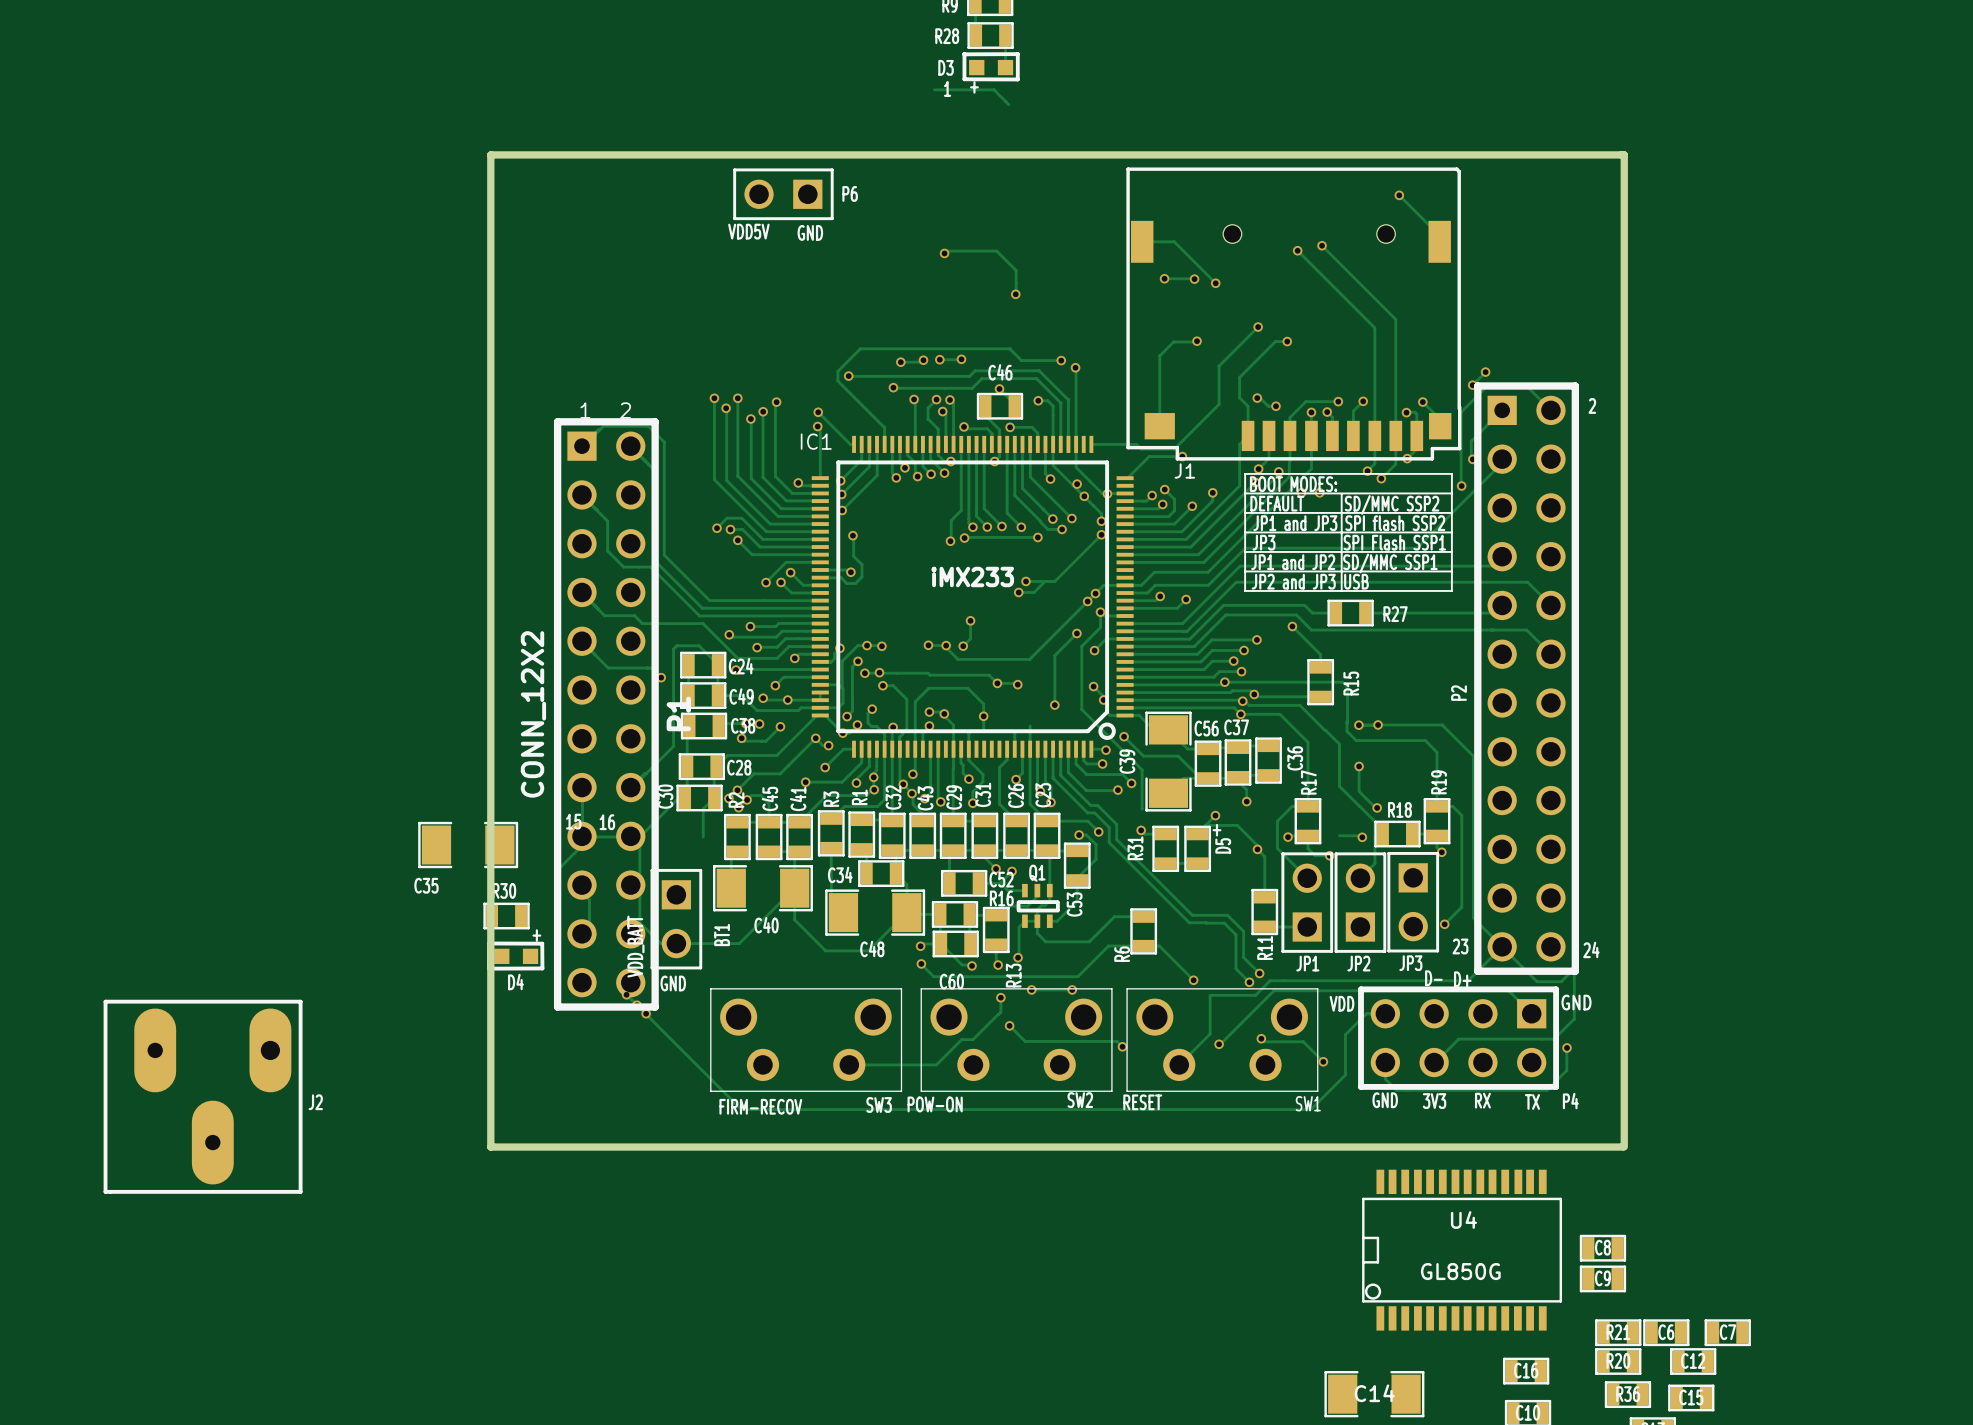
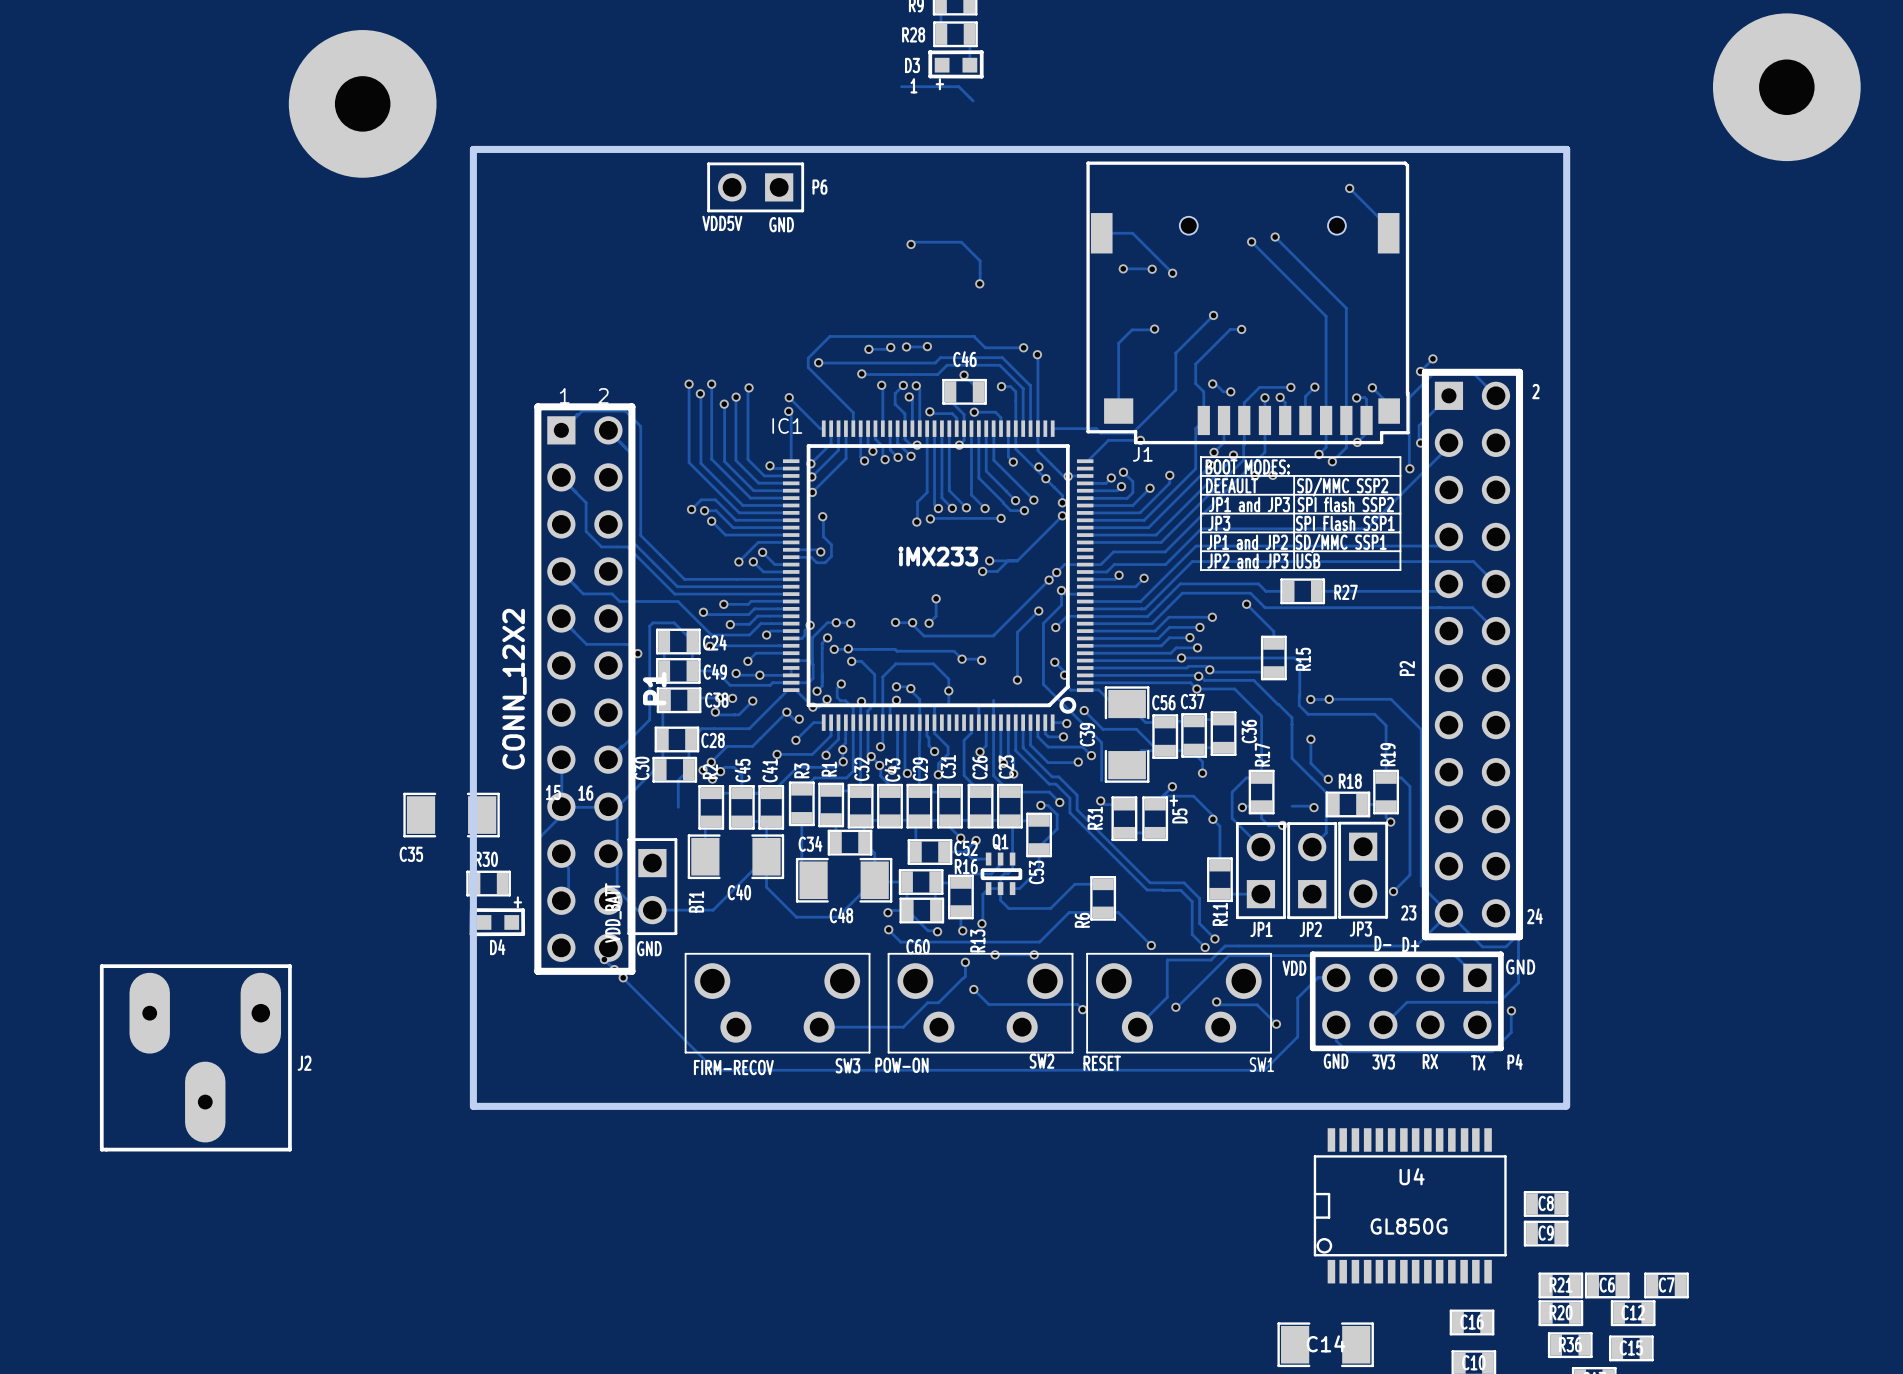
part: none -> (1786, 87)
part: none -> (362, 103)

